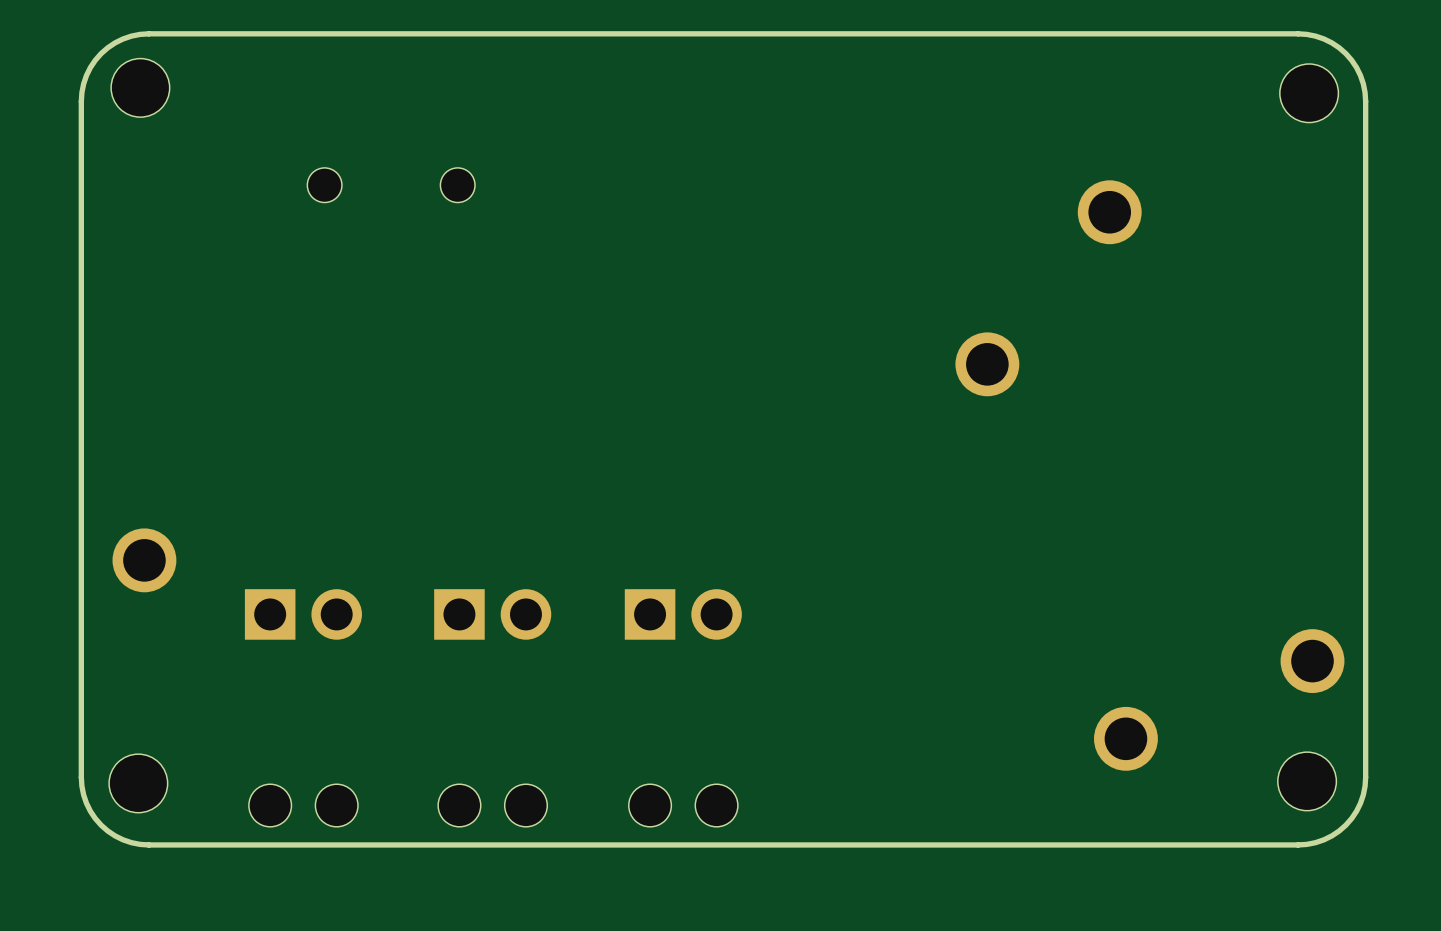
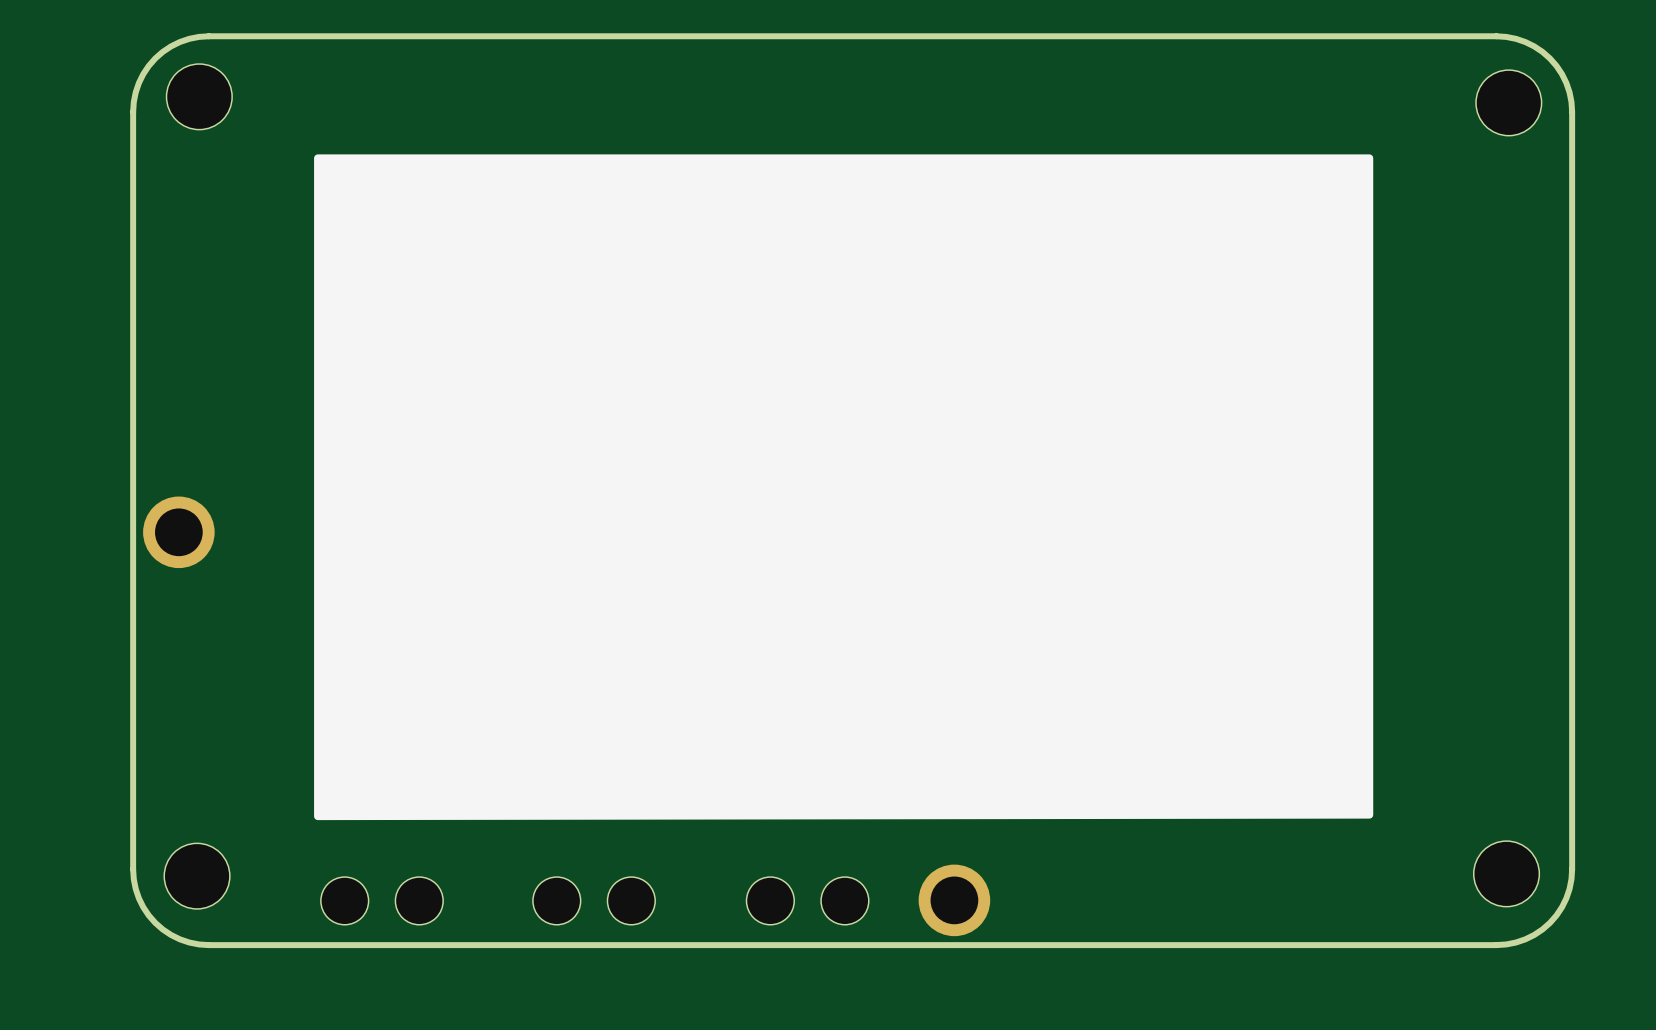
drawing: none -> [314, 154, 1374, 821]
part: (1109, 212) -> none
part: (987, 364) -> none
part position: (144, 560) -> (178, 532)
part: (1312, 661) -> none
part: (1125, 738) -> none
part: none -> (954, 900)

